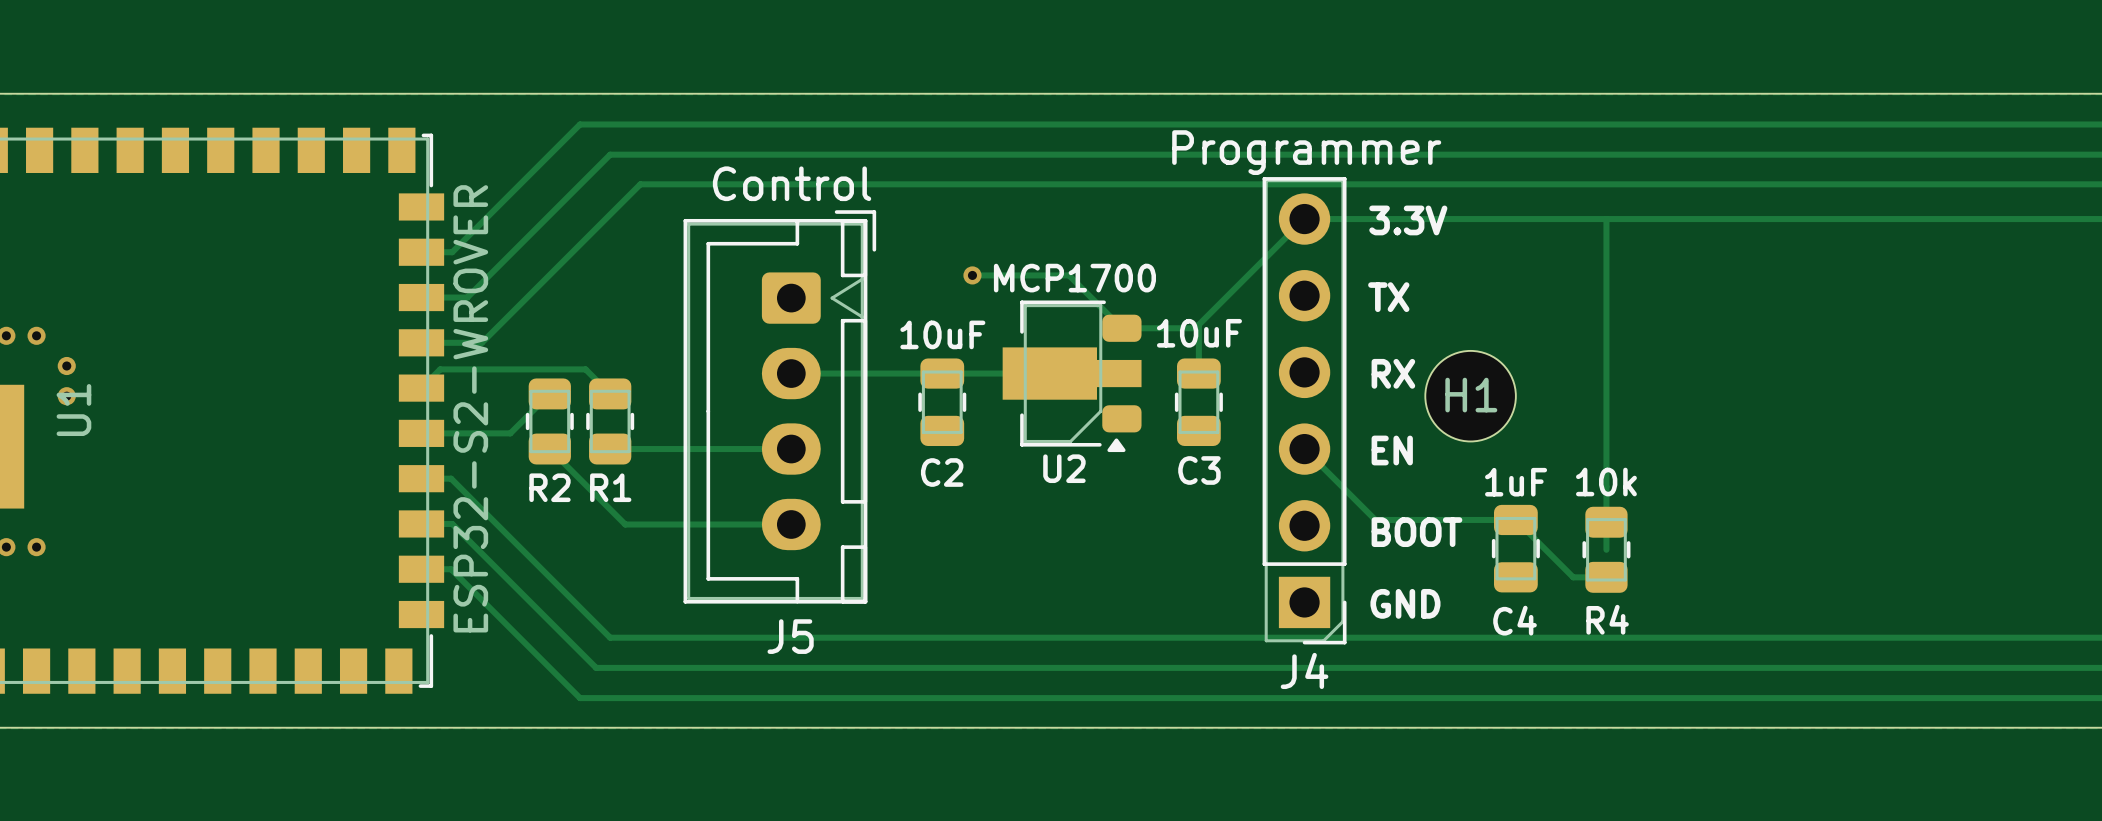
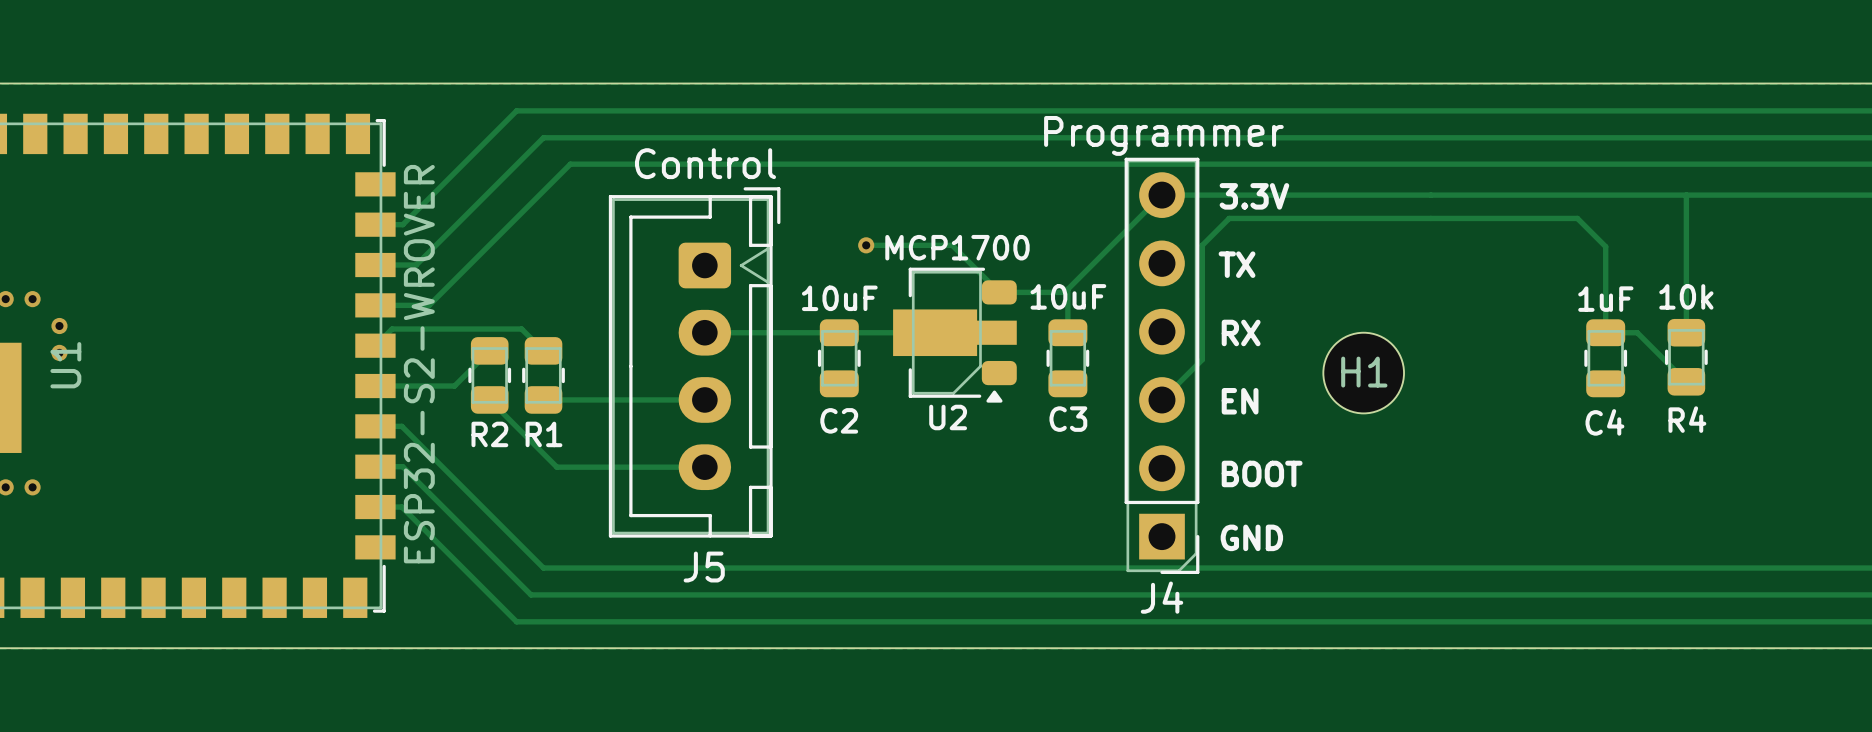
track: (1606, 219) (1606, 549) -> none
track: none -> (1686, 195) (1686, 332)
H1 position: (1470, 396) -> (1363, 373)
track: (1304, 449) (1375, 519) (1515, 519) (1573, 577) (1606, 577) -> (1162, 400) (1202, 359) (1202, 245) (1229, 218) (1577, 218) (1605, 246) (1605, 332) (1637, 332) (1686, 381)
C4 position: (1515, 548) -> (1605, 358)
R4 position: (1606, 549) -> (1686, 357)

